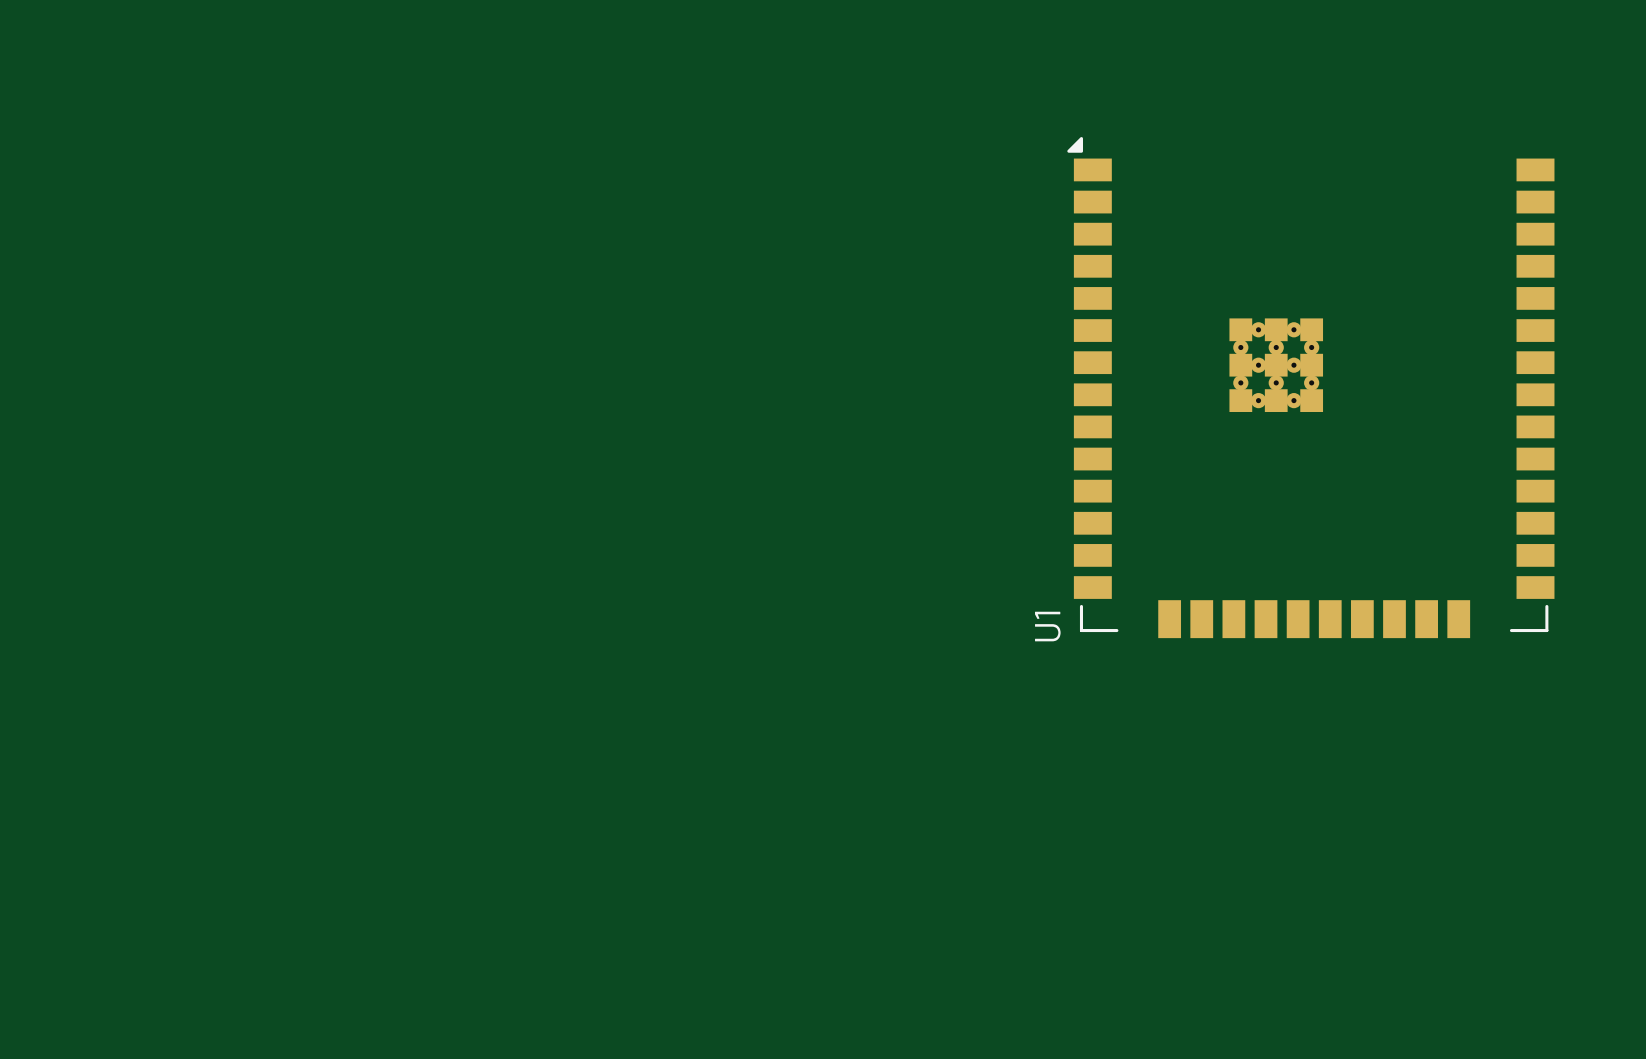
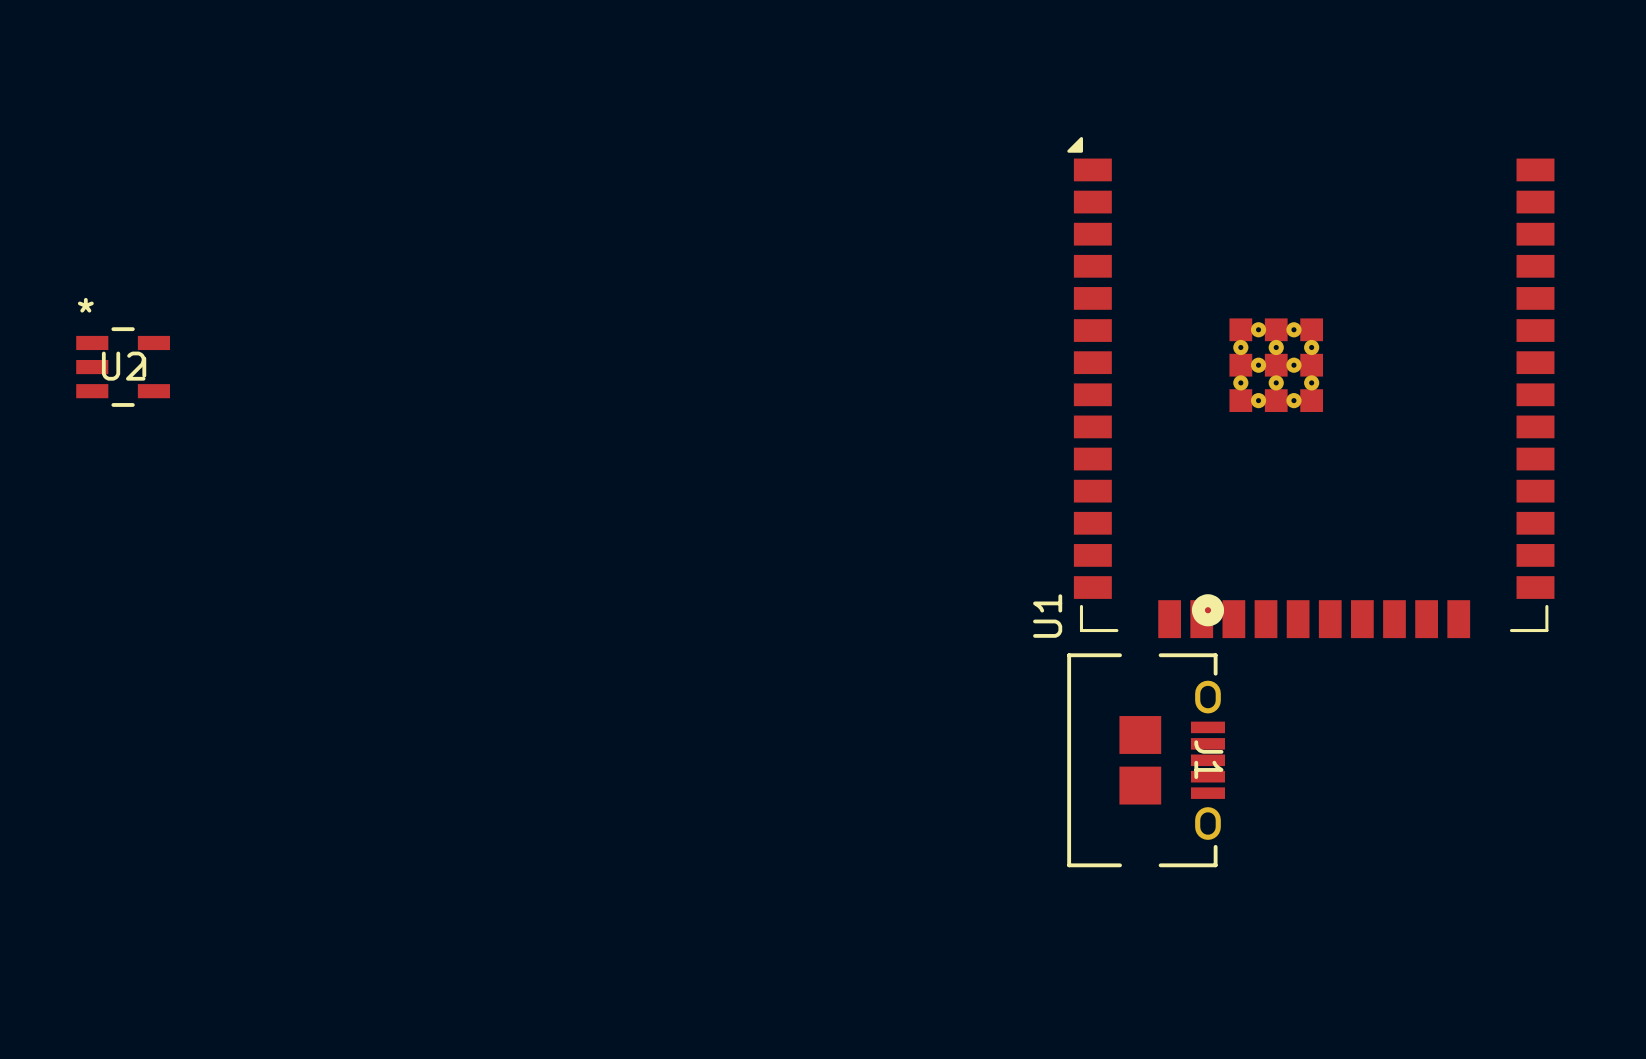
U2: none -> (123, 367)
J1: none -> (1146, 730)

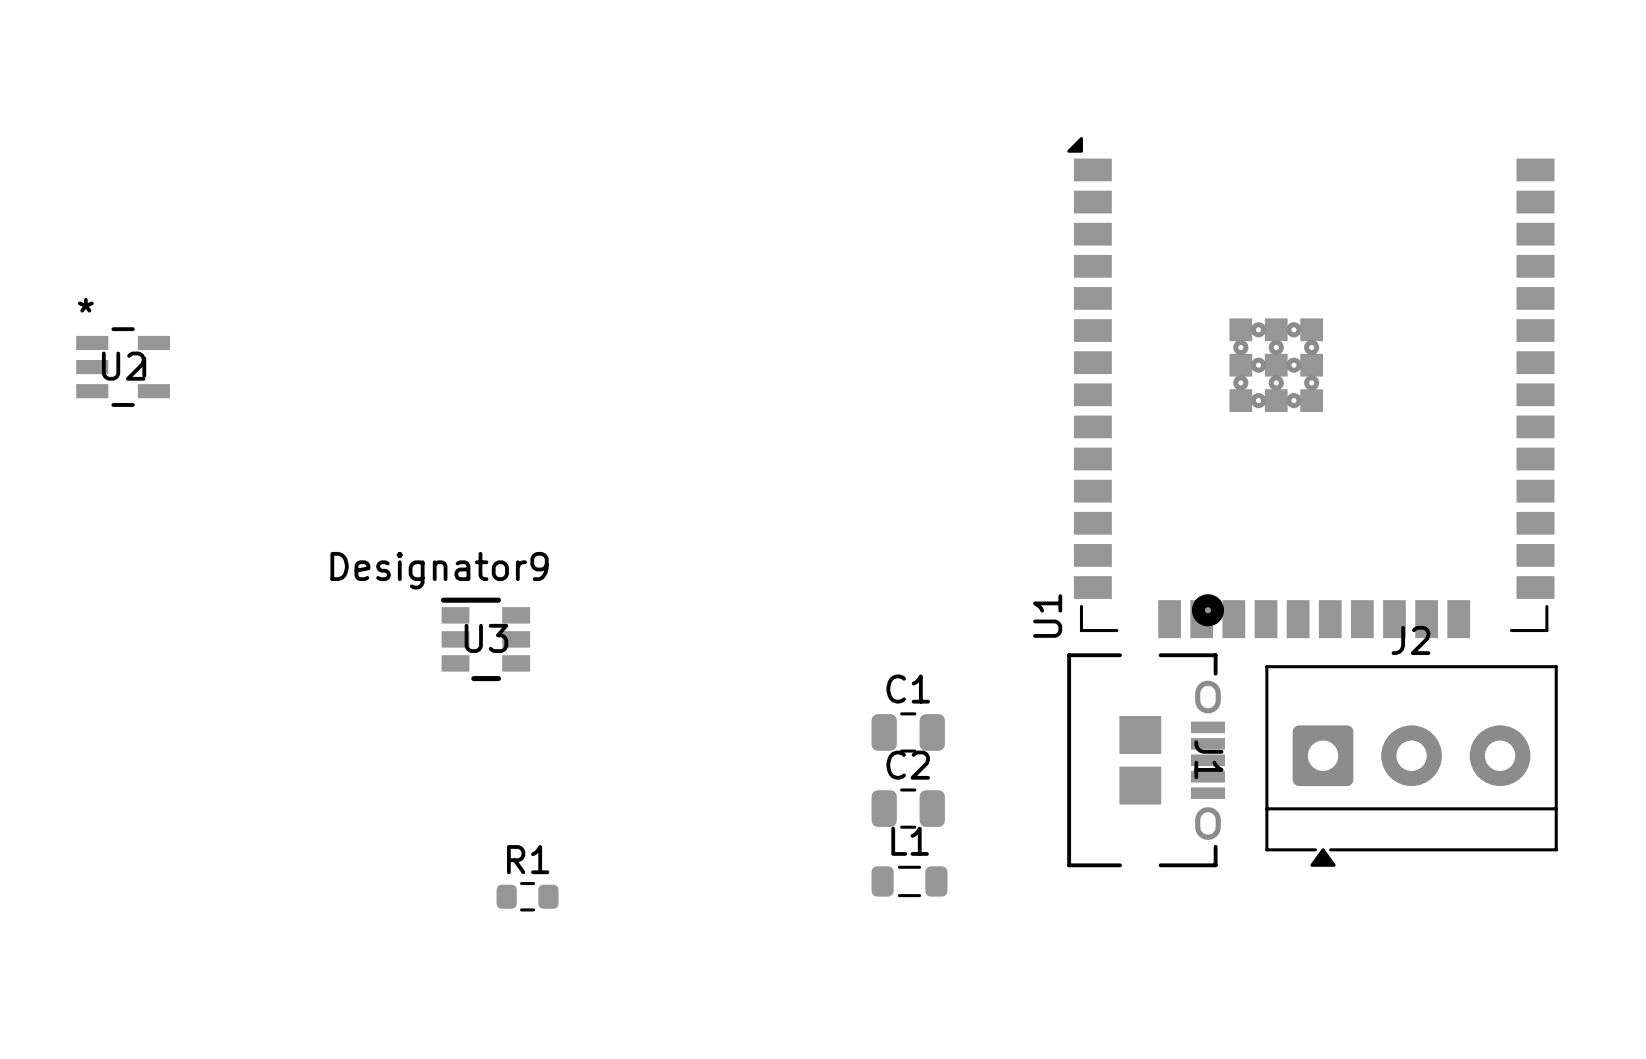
U3: none -> (485, 639)
C1: none -> (908, 732)
J2: none -> (1411, 765)
C2: none -> (908, 808)
L1: none -> (909, 881)
R1: none -> (527, 896)

